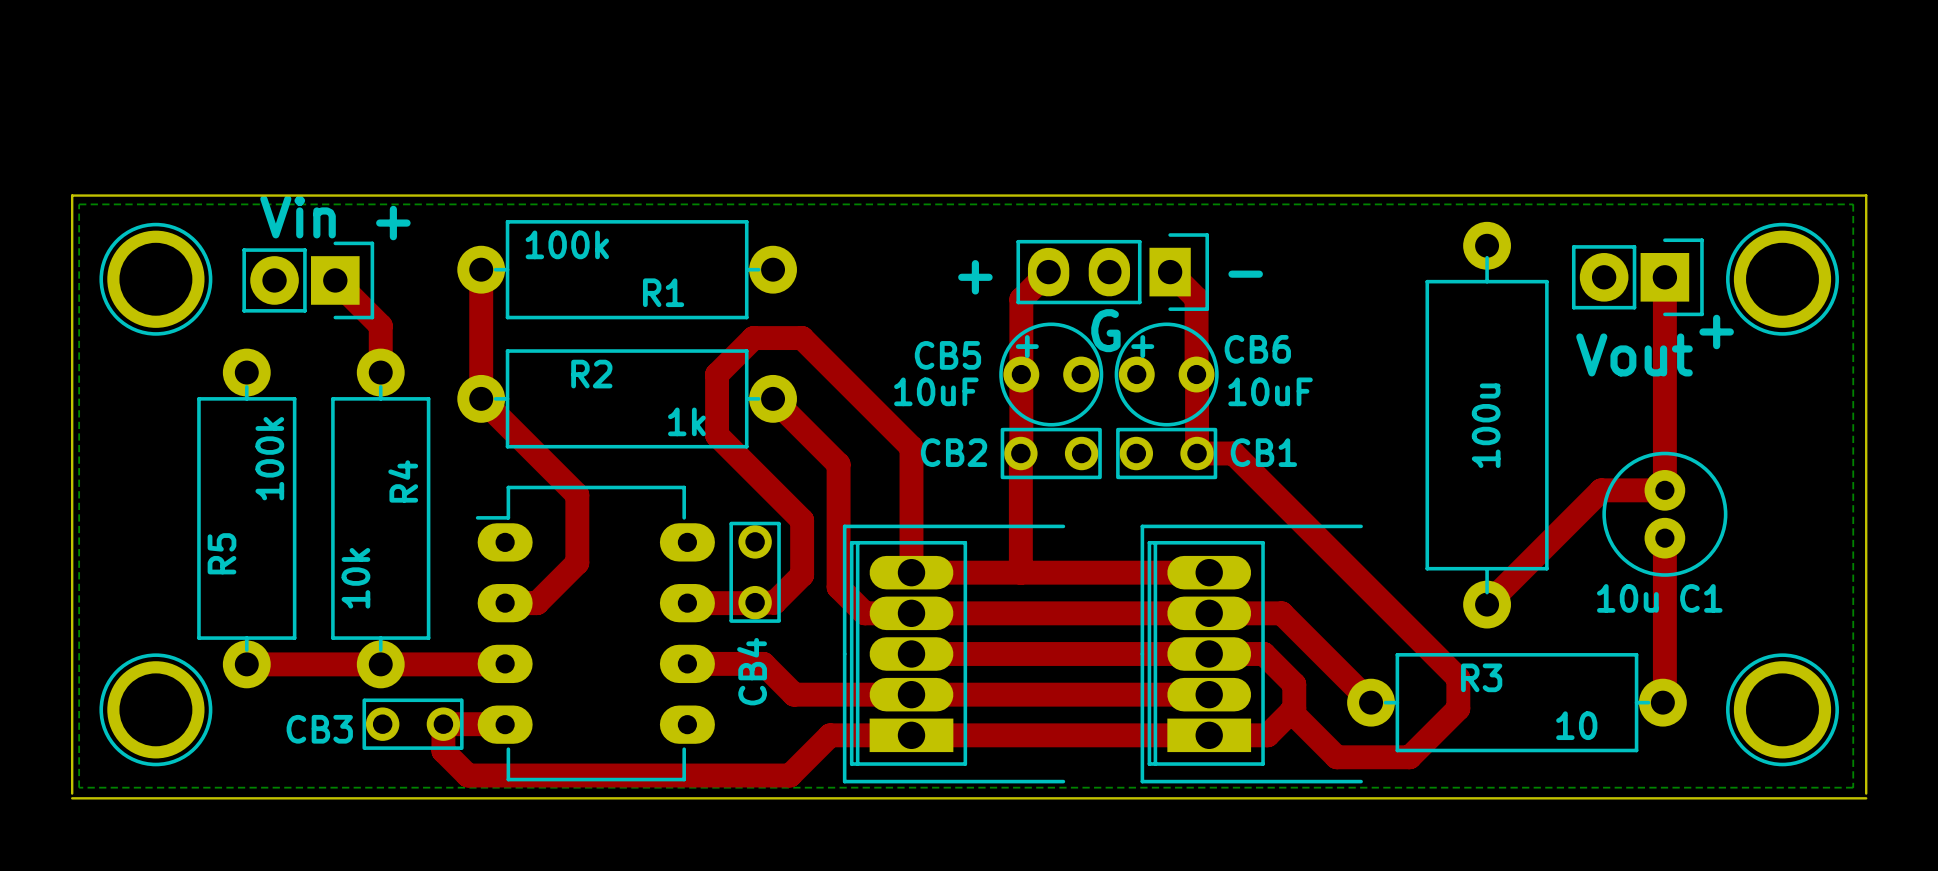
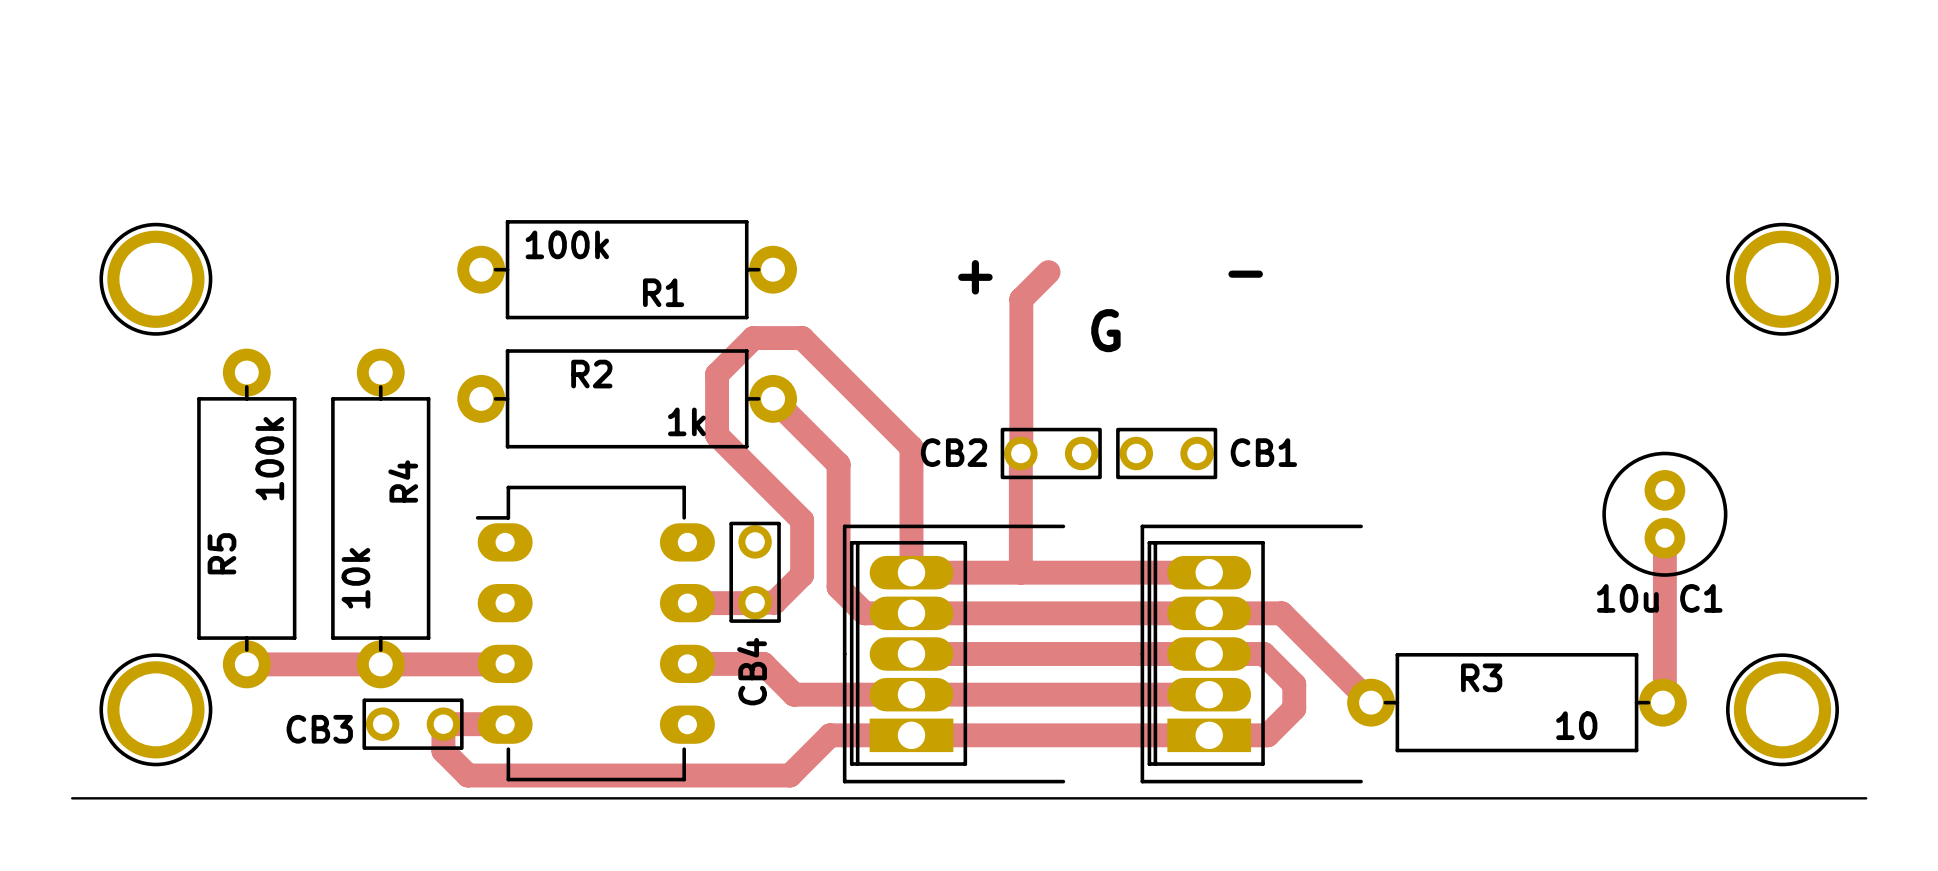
bottom zone outline: (79, 204) (79, 787) (1853, 787) (1853, 204) (79, 204) -> none
text: Vin (298, 216) -> none
text: + (393, 223) -> none
top track: (481, 269) (481, 398) (577, 494) (577, 562) (537, 603) (505, 603) -> none
part: (1112, 272) -> none
top track: (1170, 272) (1196, 298) (1197, 453) (1233, 453) (1458, 678) (1458, 708) (1409, 757) (1336, 757) (1291, 711) -> none
part: (1637, 277) -> none
top track: (1662, 279) (1664, 277) (1664, 490) (1601, 490) (1487, 604) -> none
part: (308, 280) -> none
top track: (335, 280) (380, 325) (380, 372) -> none
text: + (1716, 331) -> none
text: Vout (1634, 354) -> none
CB5: 10uF (1051, 374) -> none
CB6: 10uF (1166, 374) -> none
part: 100u (1487, 425) -> none
board edge: (72, 793) (72, 195) (1866, 195) (1866, 793) -> none

